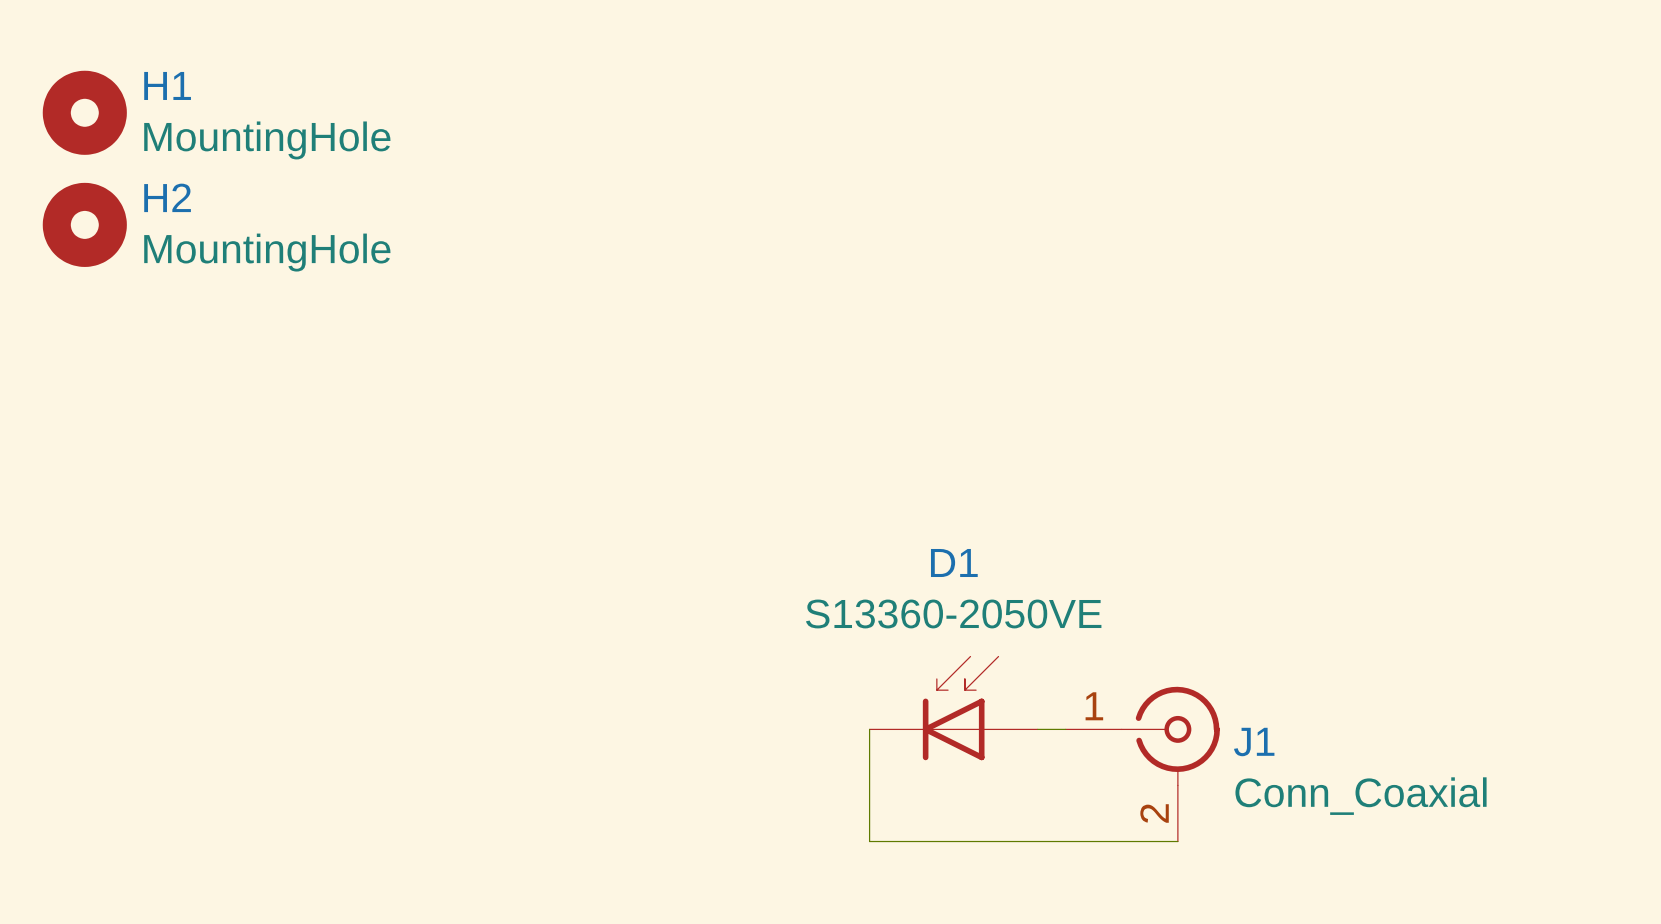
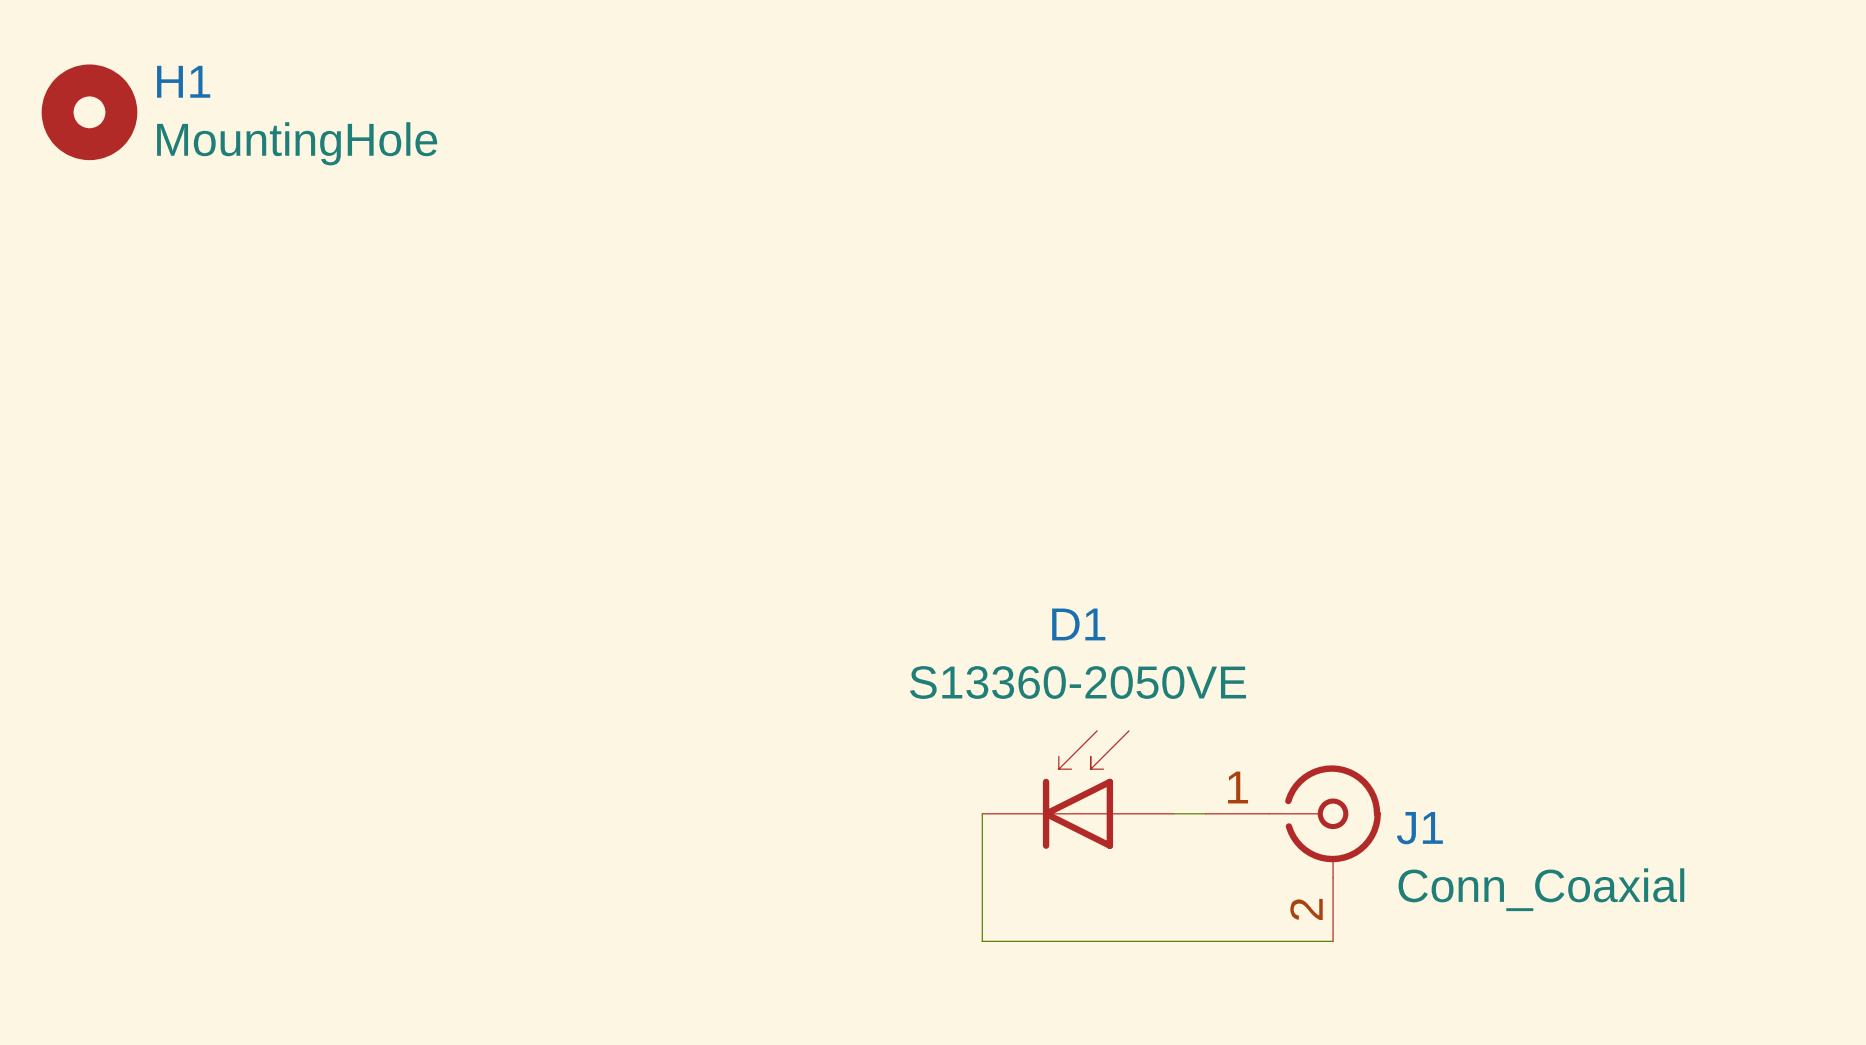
H2: MountingHole (84, 224) -> none

